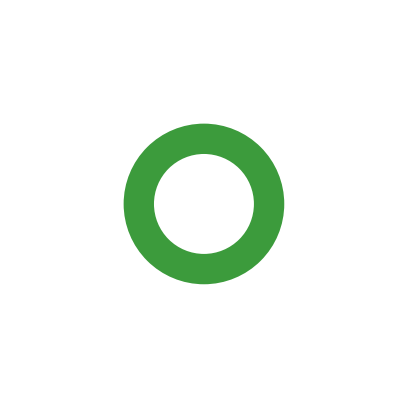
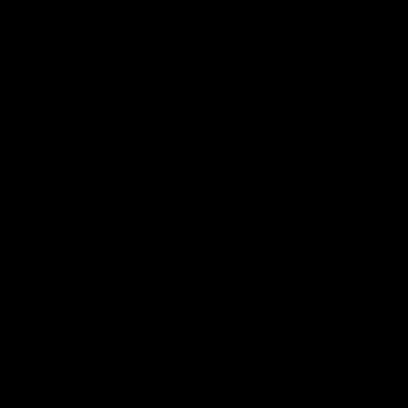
via: (203, 203) -> none

